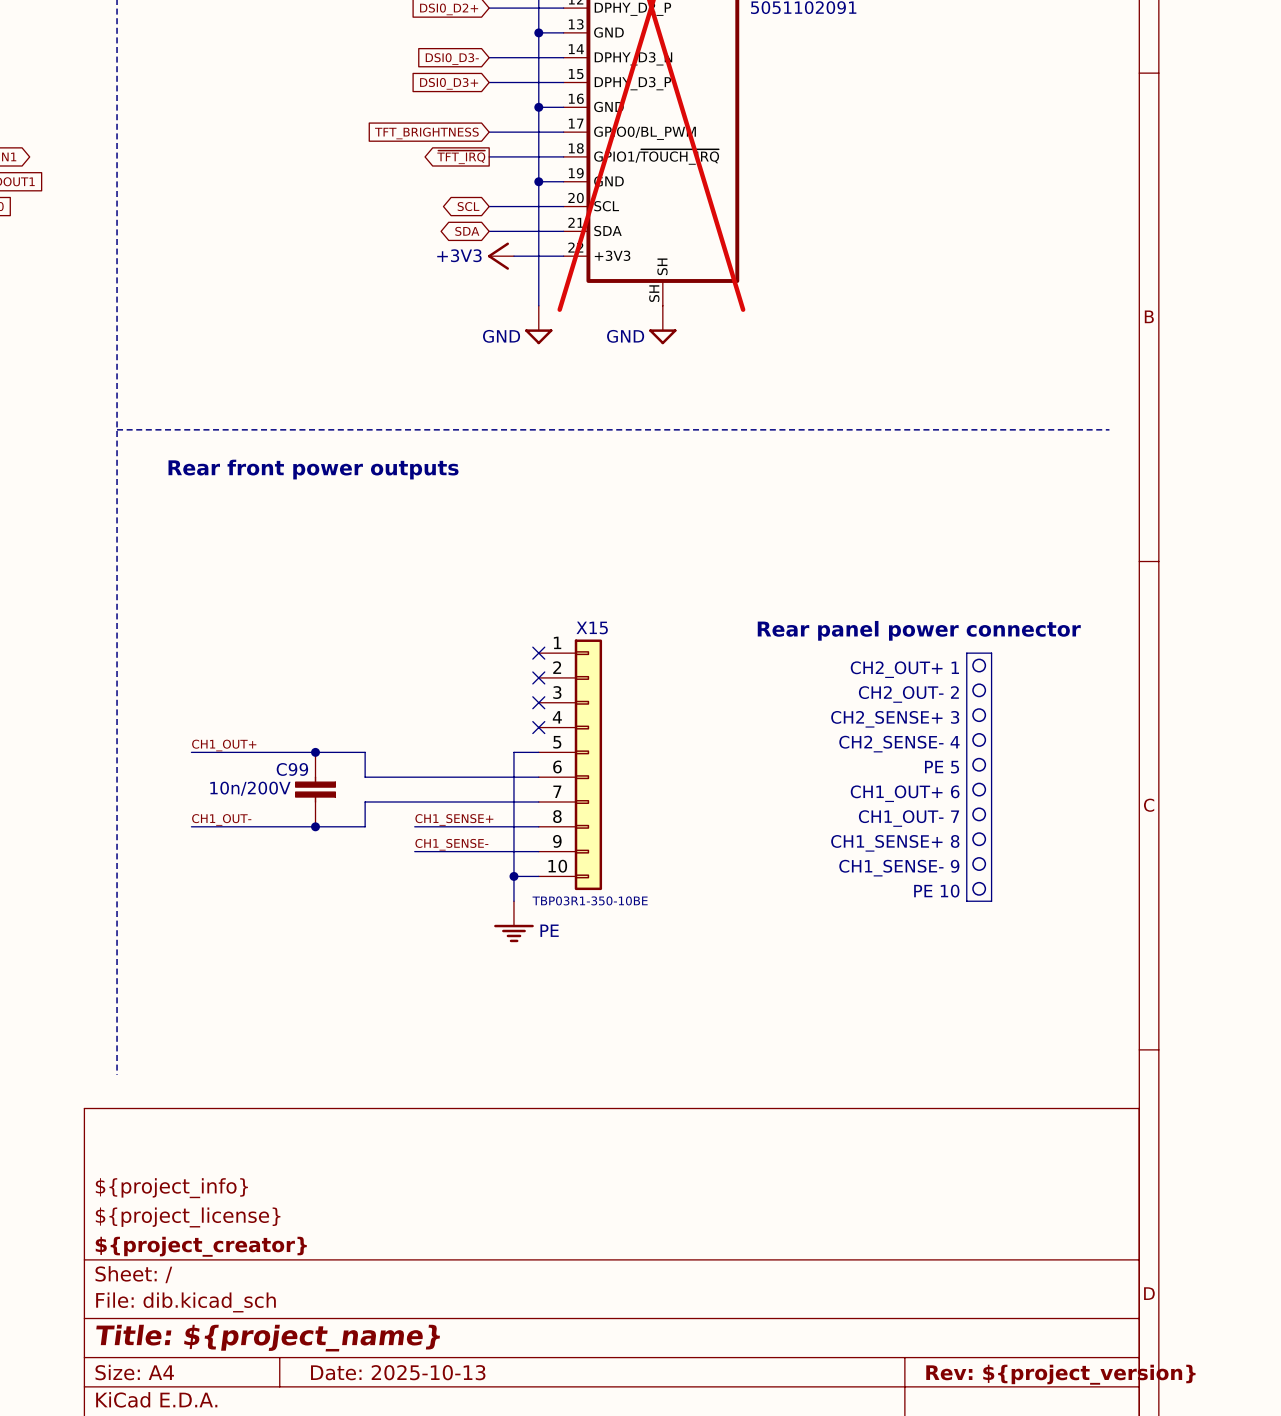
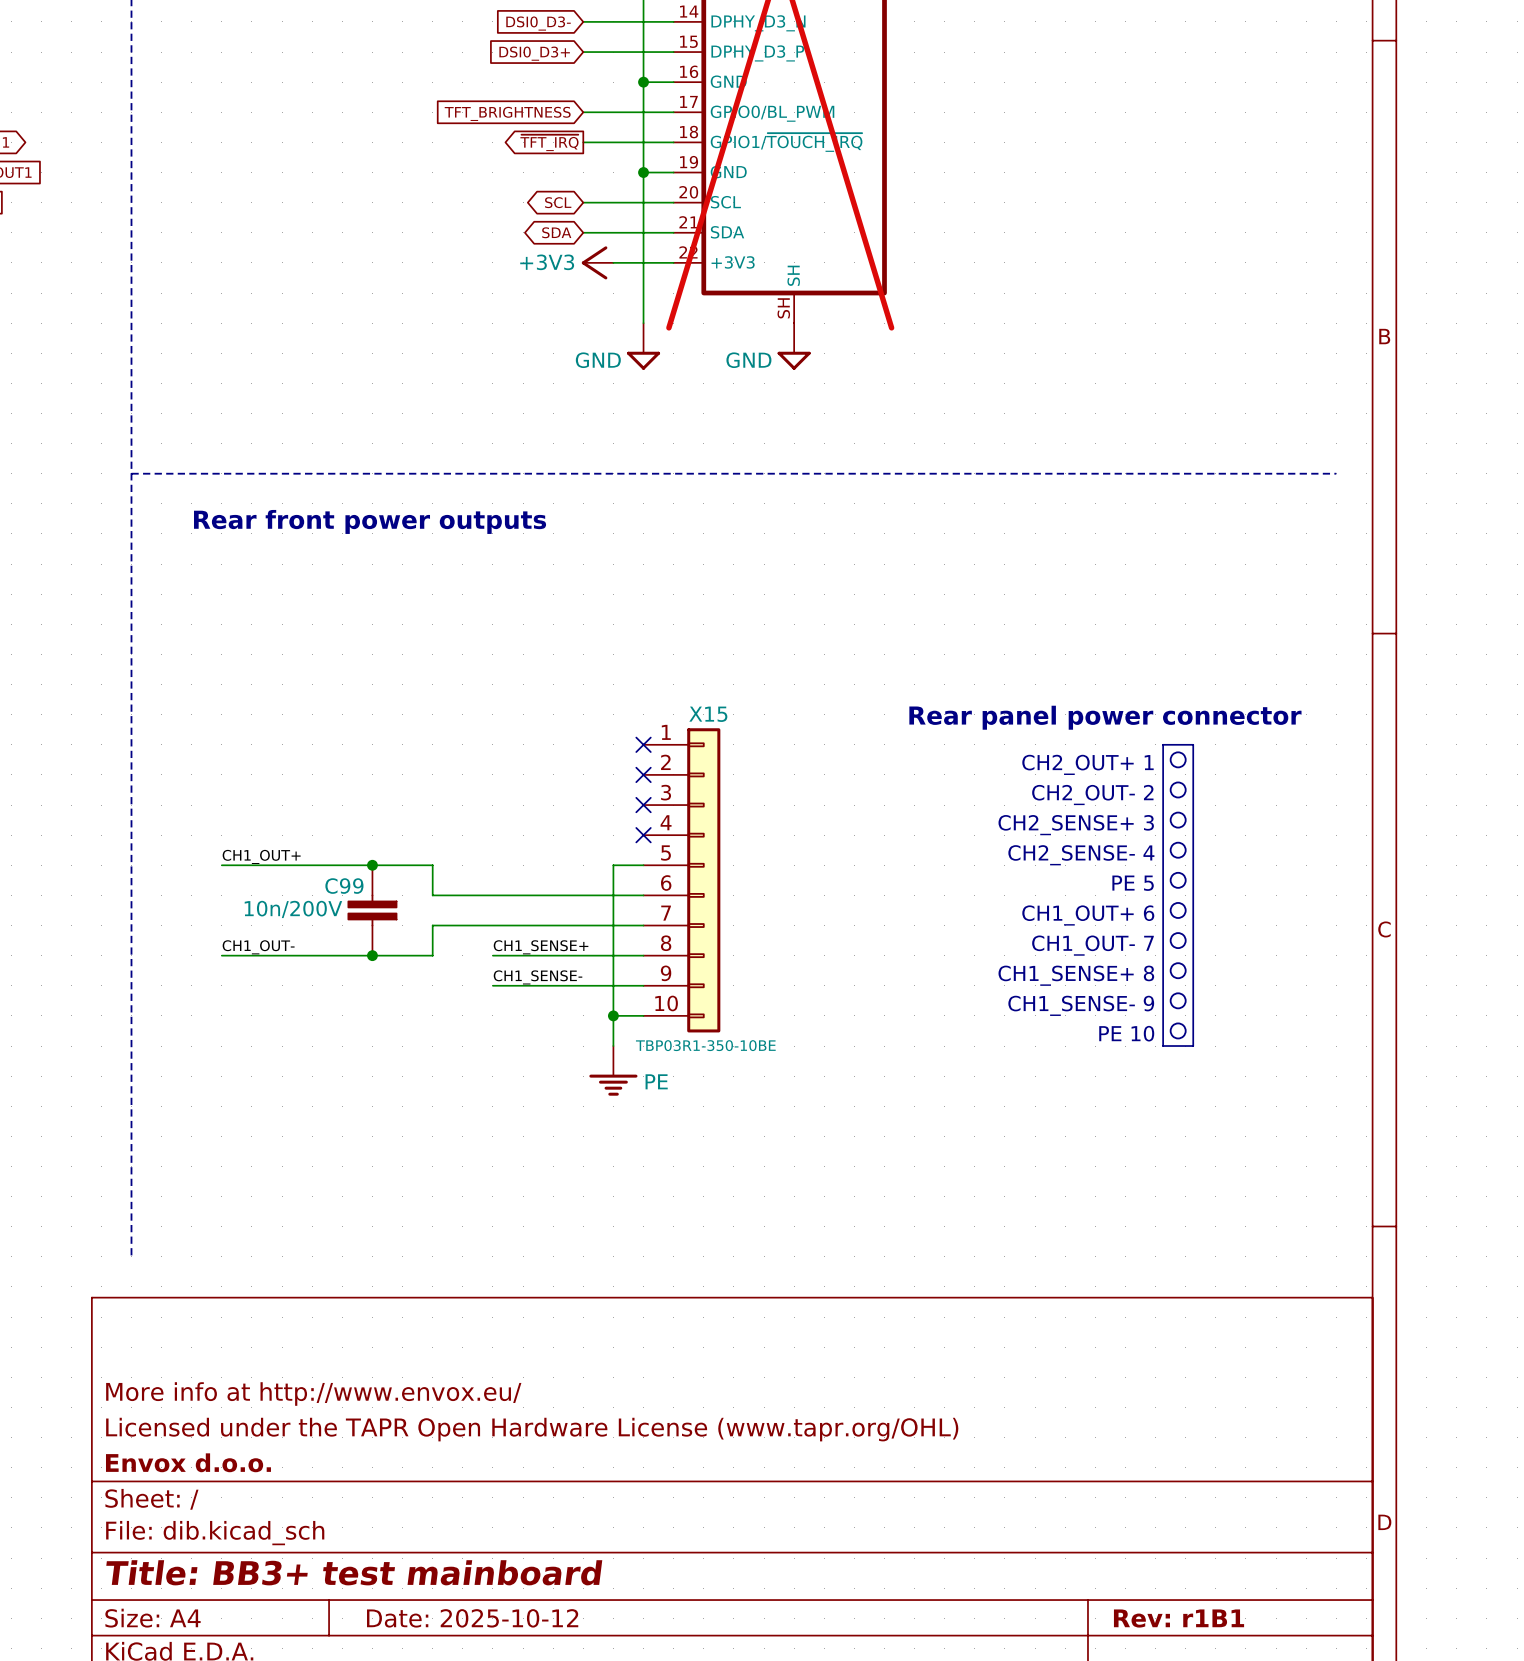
title block: ${project_info} (171, 1188) -> More info at http://www.envox.eu/ (313, 1394)
title block: ${project_license} (188, 1217) -> Licensed under the TAPR Open Hardware License (www.tapr.org/OHL) (532, 1429)
title block: ${project_creator} (201, 1246) -> Envox d.o.o. (188, 1462)
title block: Title: ${project_name} (268, 1338) -> Title: BB3+ test mainboard (354, 1572)
title block: Date: 2025-10-13 (398, 1372) -> Date: 2025-10-12 (472, 1618)
title block: Rev: ${project_version} (1060, 1374) -> Rev: r1B1 (1179, 1618)

